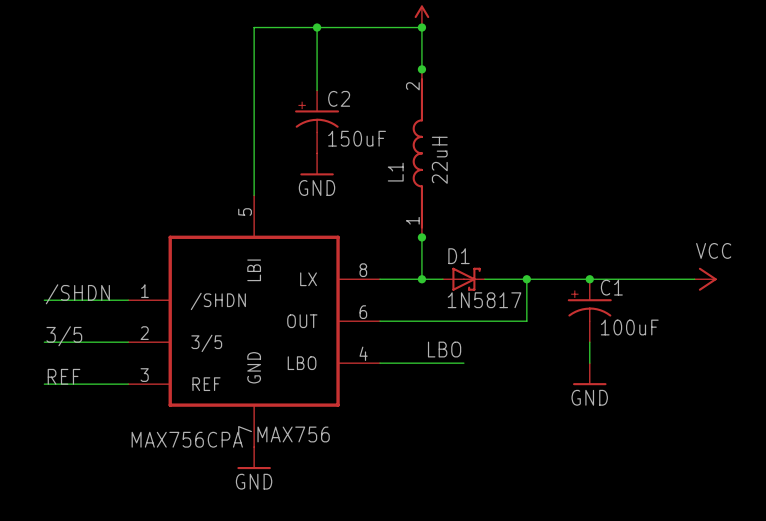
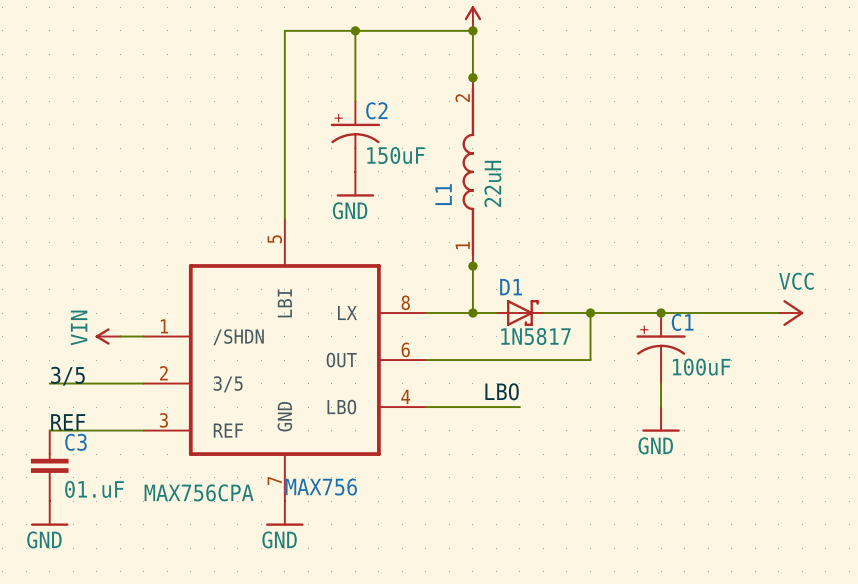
label: /SHDN (77, 294) -> none
wire: (44, 300) (107, 300) -> none
power symbol: none -> VIN (107, 336)
C3: none -> 01.uF (49, 465)
power symbol: none -> GND (49, 513)

